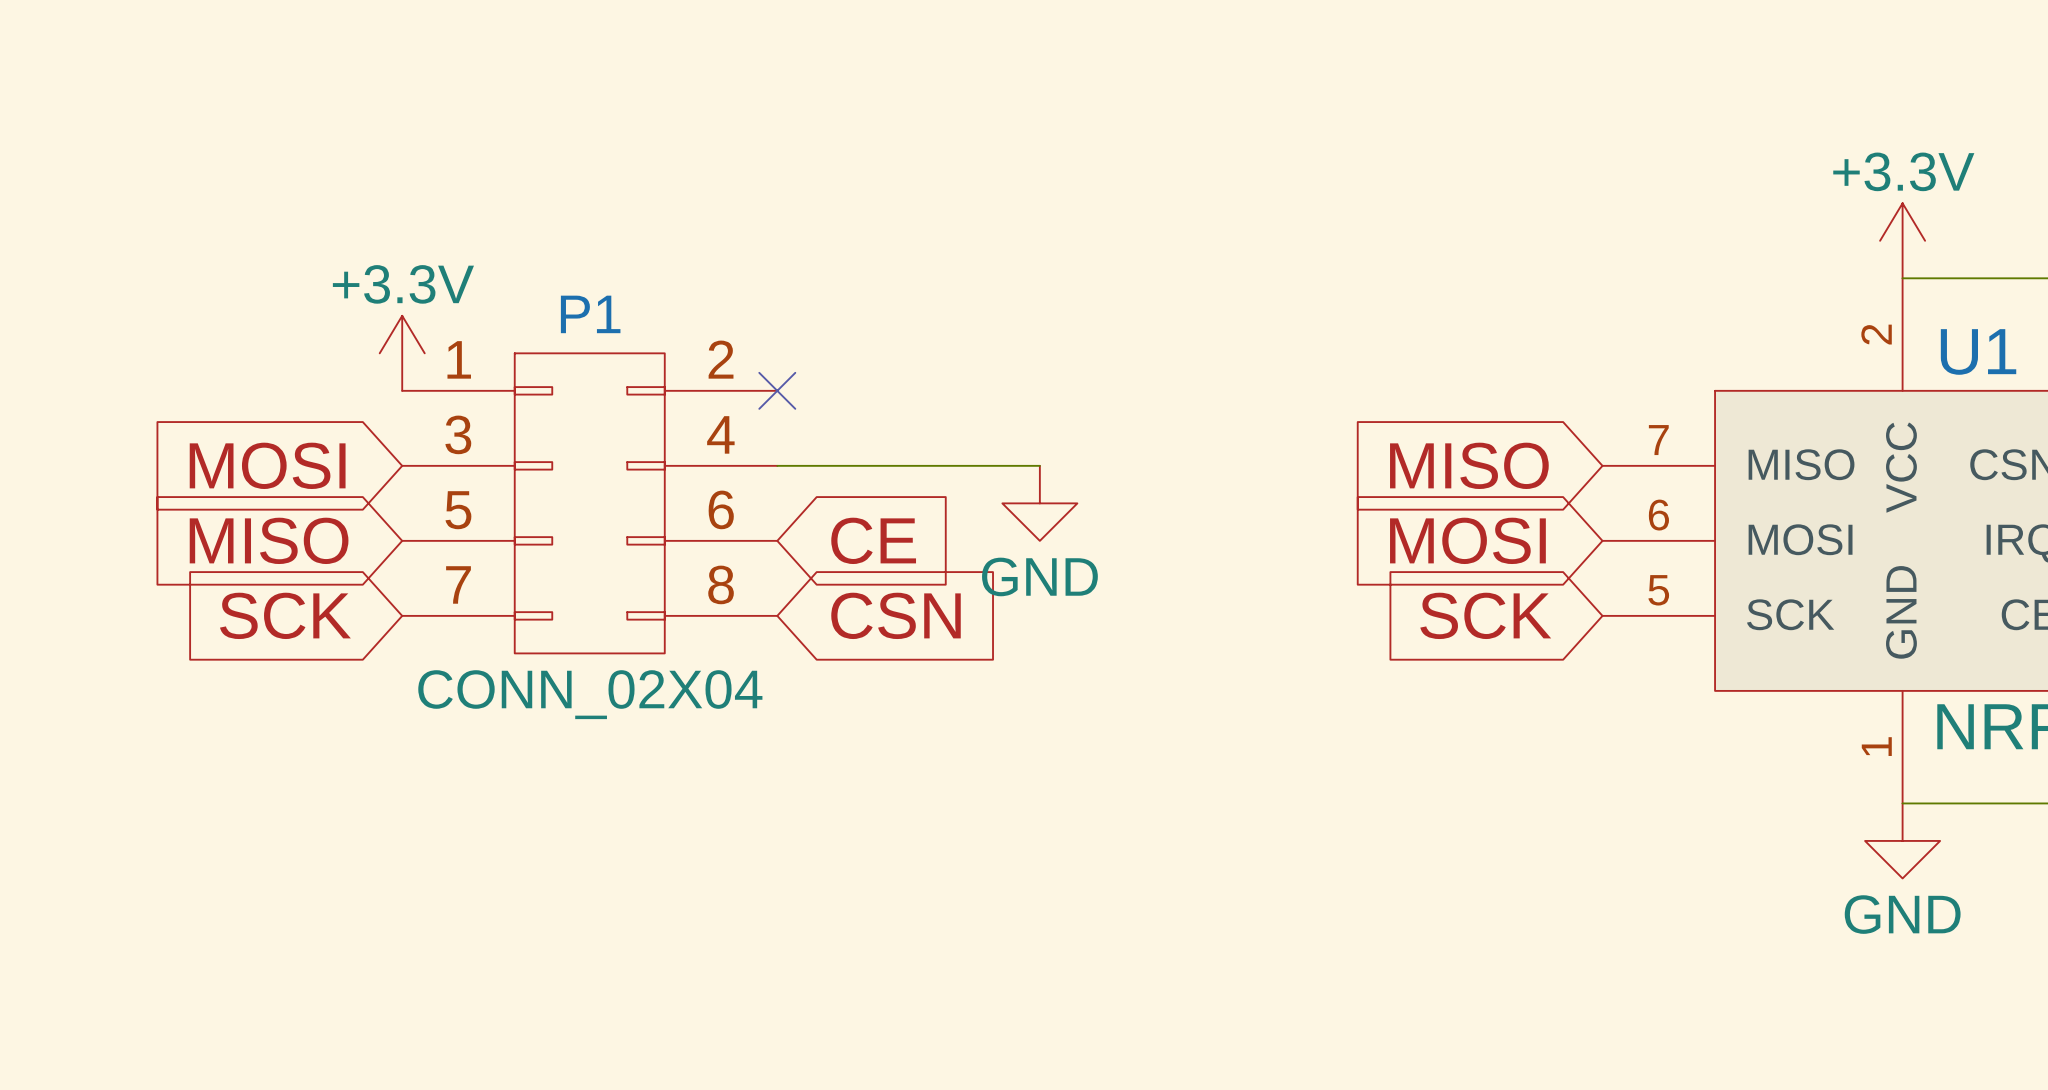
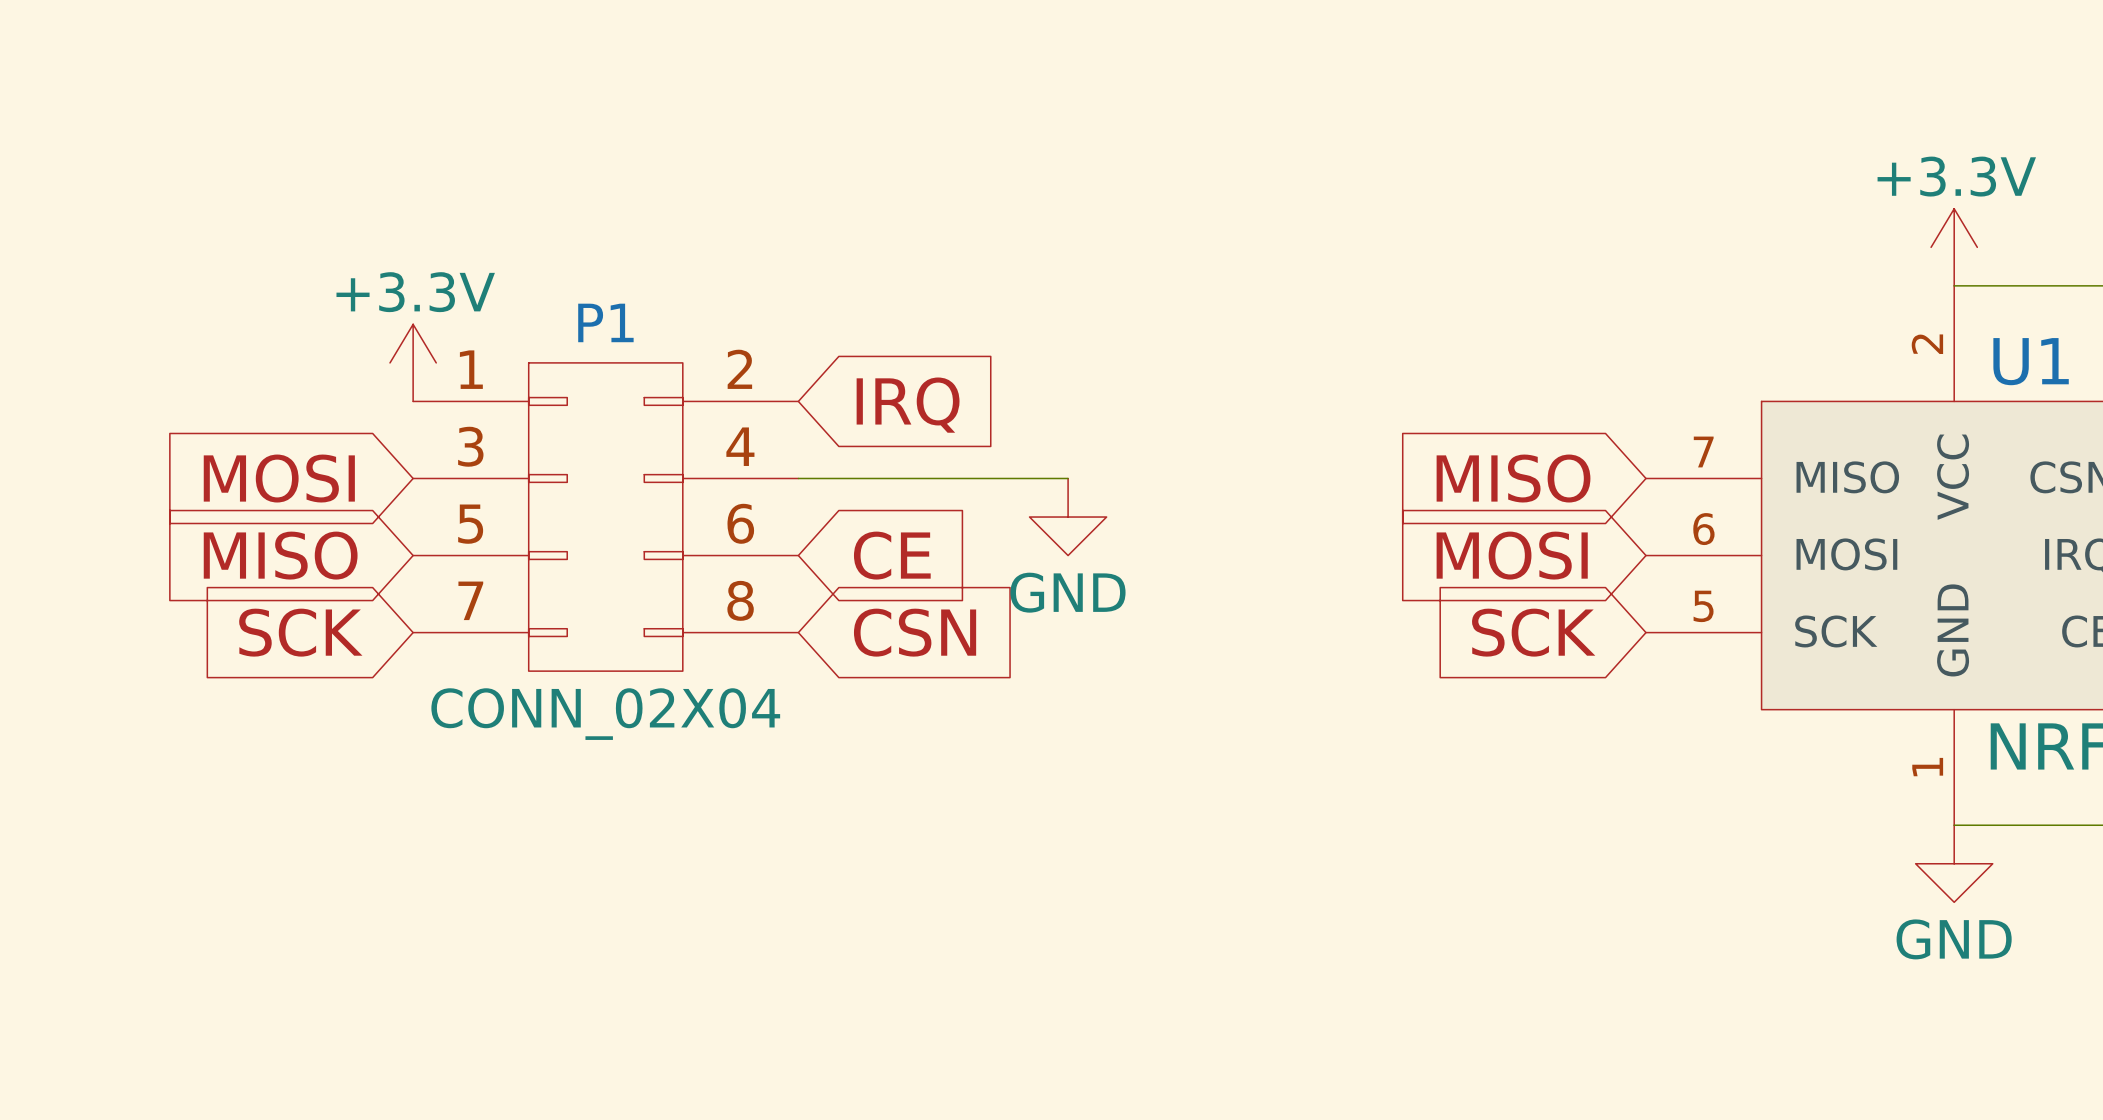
no-connect mark: (777, 390) -> none
global label: none -> IRQ (908, 405)

